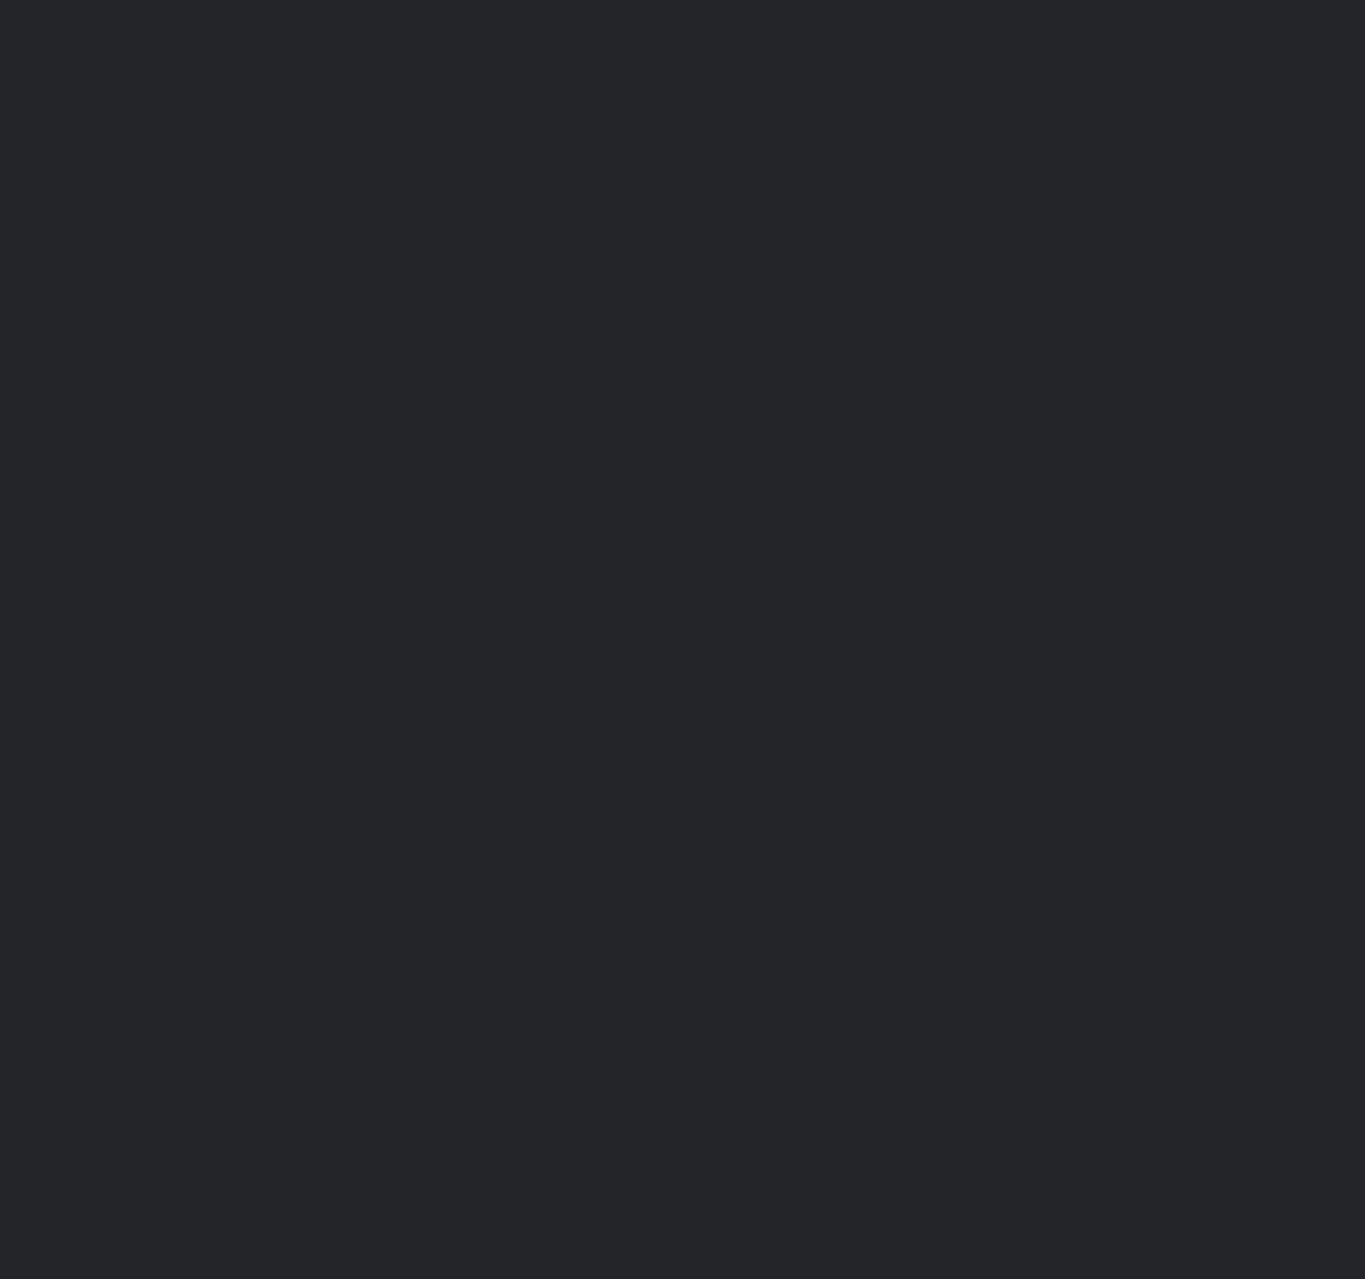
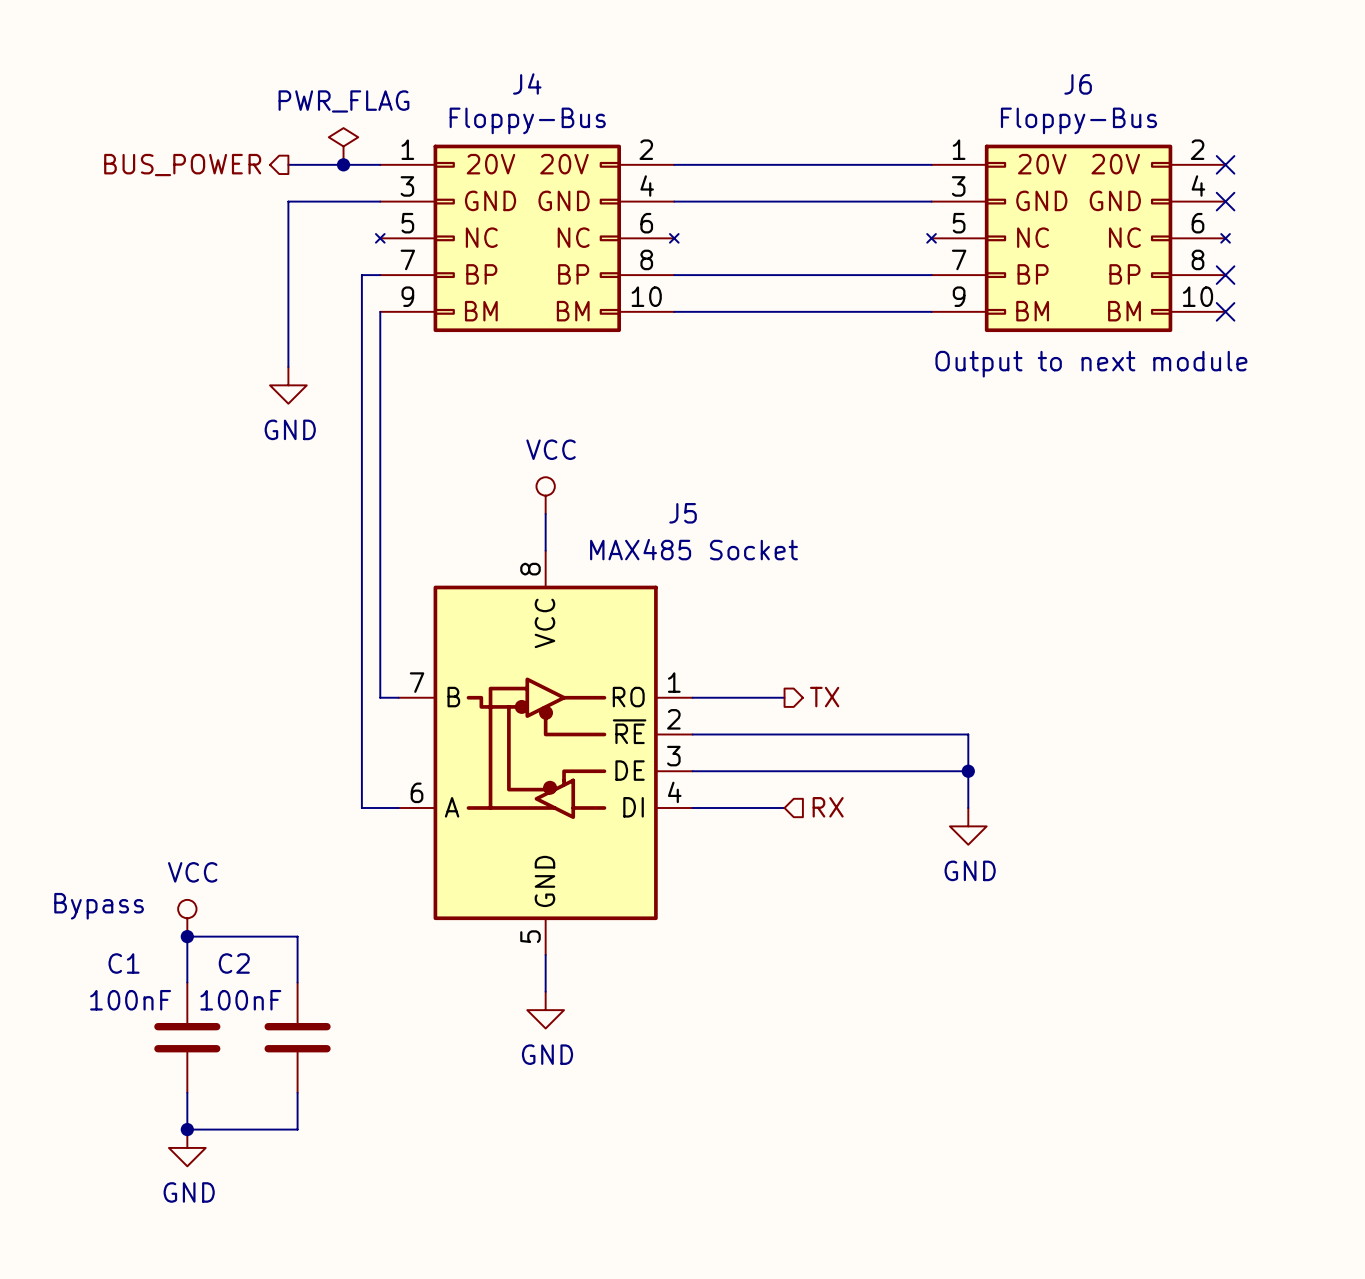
power symbol: none -> PWR_FLAG (343, 146)
wire: none -> (288, 164) (380, 164)
junction: none -> (343, 164)
wire: none -> (674, 164) (931, 164)
no-connect mark: none -> (1225, 164)
hierarchical label: none -> BUS_POWER (182, 165)
wire: none -> (380, 201) (288, 201) (288, 366)
wire: none -> (674, 201) (931, 201)
no-connect mark: none -> (1225, 201)
J4: none -> Floppy-Bus (527, 238)
J6: none -> Floppy-Bus (1078, 238)
wire: none -> (380, 275) (361, 275) (361, 807) (398, 807)
wire: none -> (674, 275) (931, 275)
no-connect mark: none -> (1225, 275)
wire: none -> (380, 311) (380, 697) (398, 697)
wire: none -> (674, 311) (931, 311)
no-connect mark: none -> (1225, 311)
text: none -> Output to next module (1091, 364)
power symbol: none -> GND (288, 385)
power symbol: none -> VCC (545, 495)
wire: none -> (545, 513) (545, 550)
wire: none -> (692, 697) (784, 697)
hierarchical label: none -> TX (824, 697)
wire: none -> (692, 734) (968, 734) (968, 807)
J5: none -> MAX485 Socket (545, 752)
wire: none -> (692, 771) (968, 771)
junction: none -> (968, 771)
wire: none -> (692, 807) (784, 807)
hierarchical label: none -> RX (828, 807)
power symbol: none -> GND (968, 826)
text: none -> Bypass (99, 906)
power symbol: none -> VCC (187, 918)
junction: none -> (187, 936)
wire: none -> (545, 955) (545, 991)
wire: none -> (187, 982) (187, 936) (297, 936) (297, 982)
power symbol: none -> GND (545, 1010)
C1: none -> 100nF (187, 1037)
C2: none -> 100nF (297, 1037)
wire: none -> (187, 1092) (187, 1129) (297, 1129) (297, 1092)
junction: none -> (187, 1129)
power symbol: none -> GND (187, 1147)

